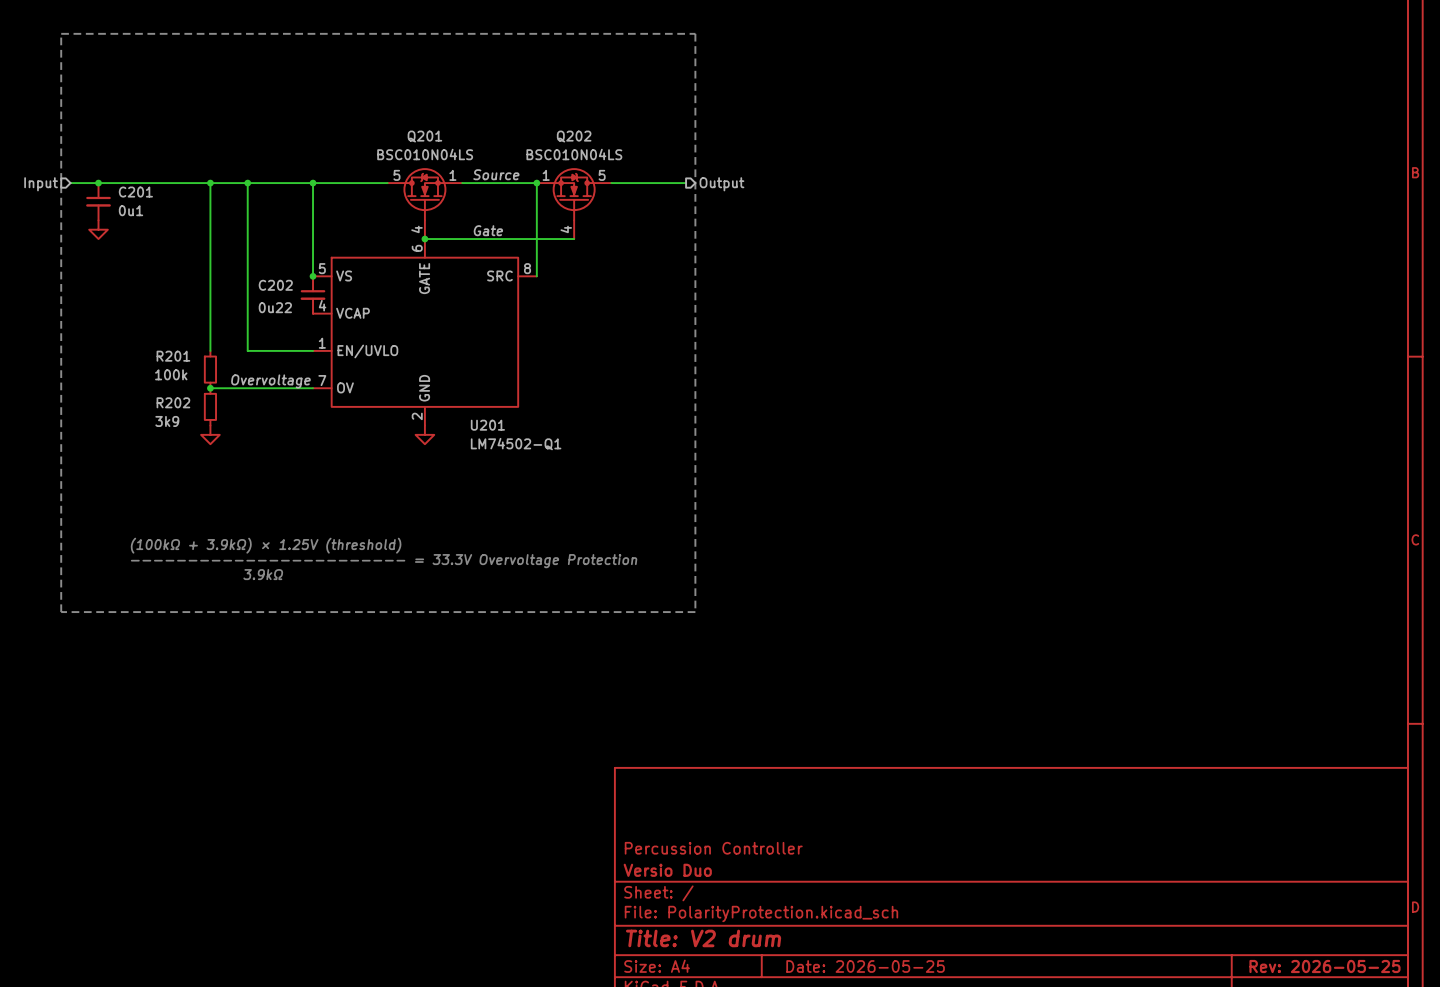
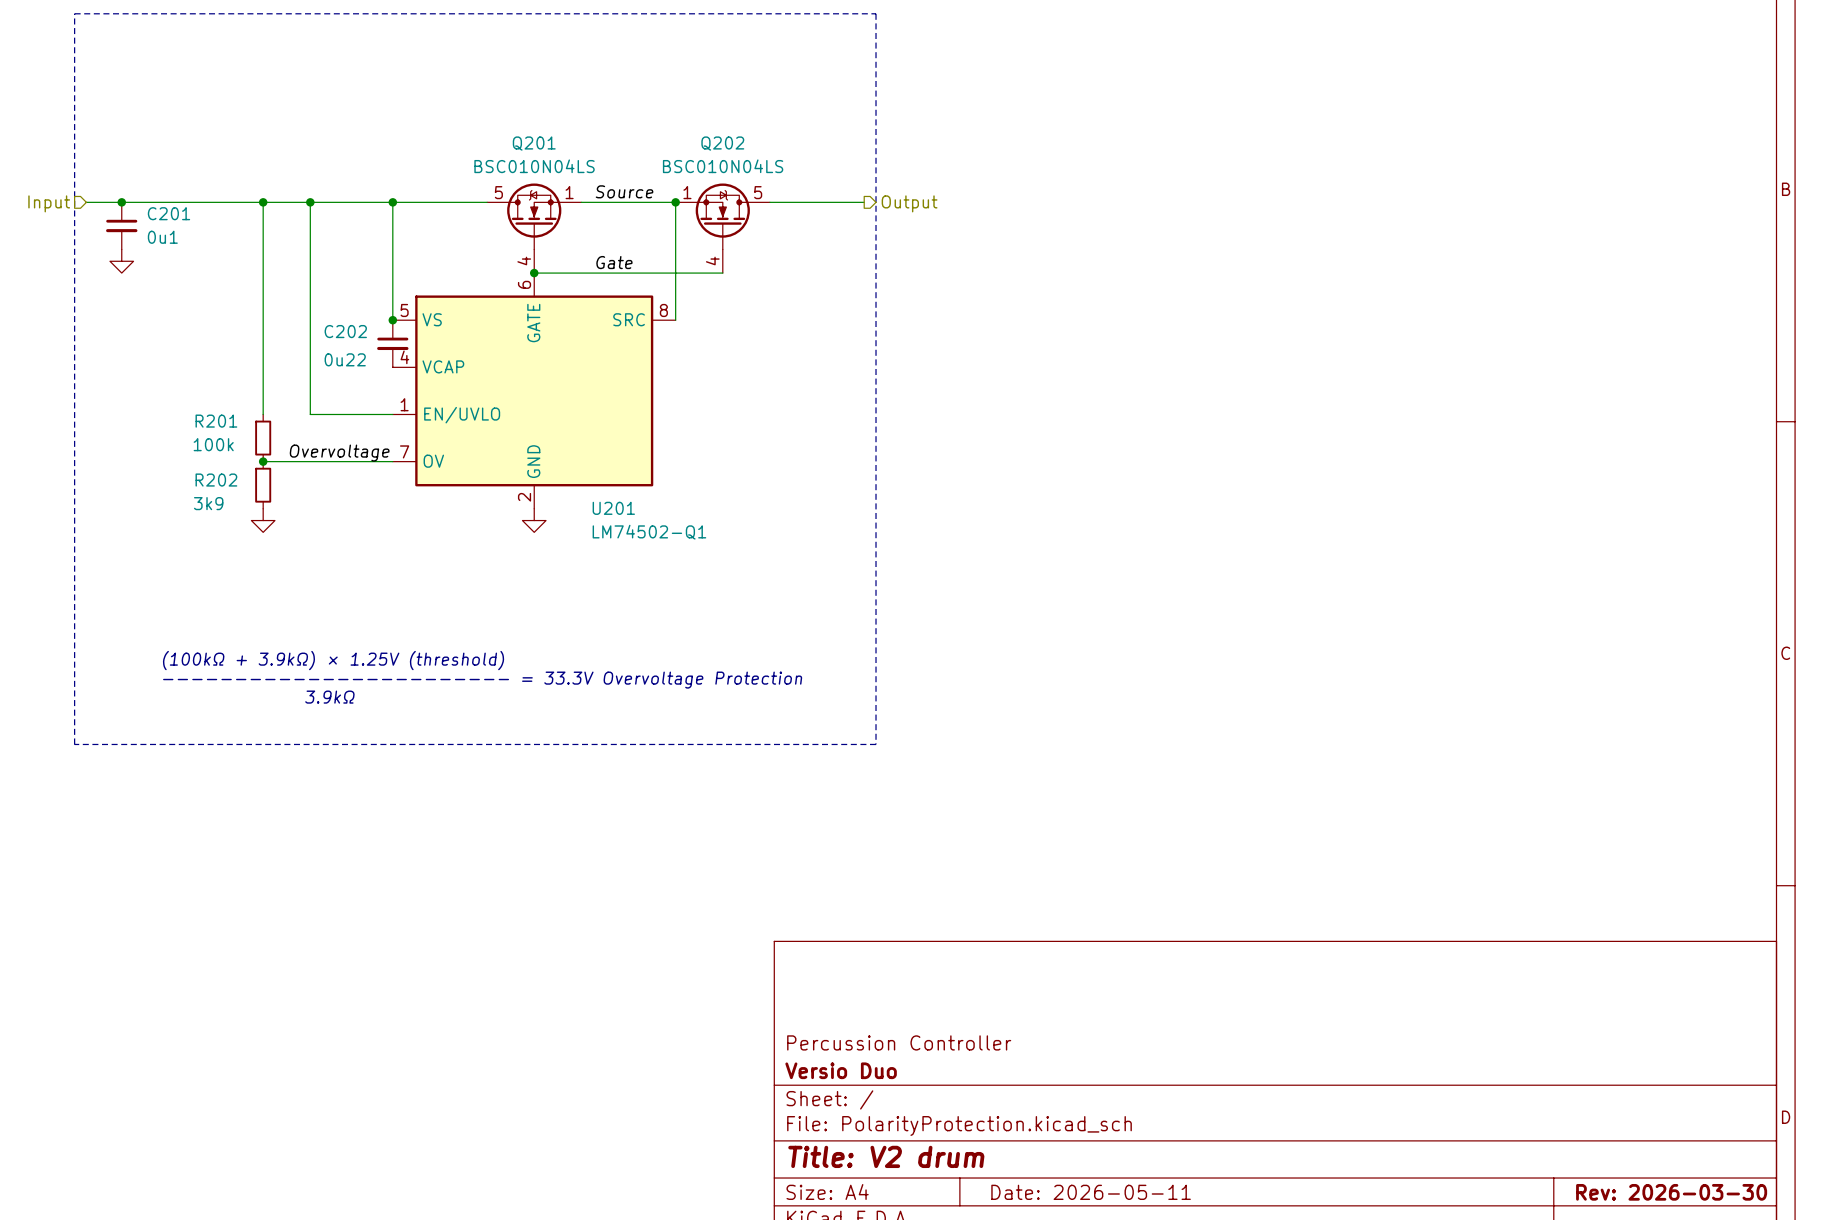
title block: Date: 2026-05-25 (865, 966) -> Date: 2026-05-11 (1091, 1192)
title block: Rev: 2026-05-25 (1324, 966) -> Rev: 2026-03-30 (1671, 1192)

